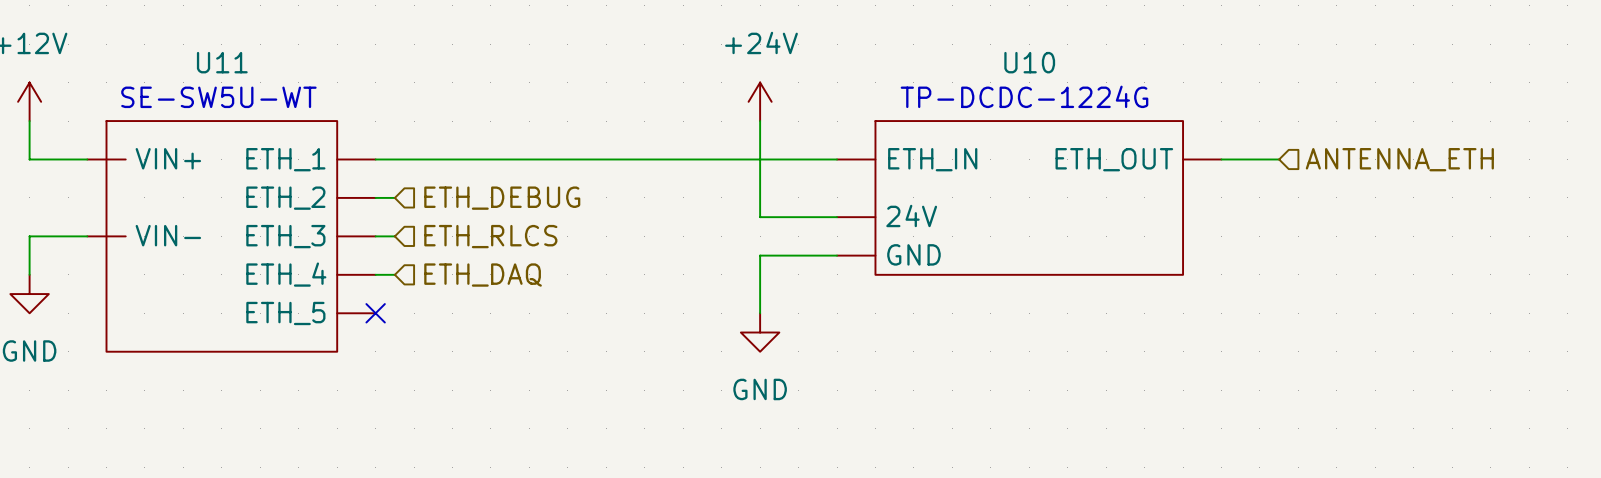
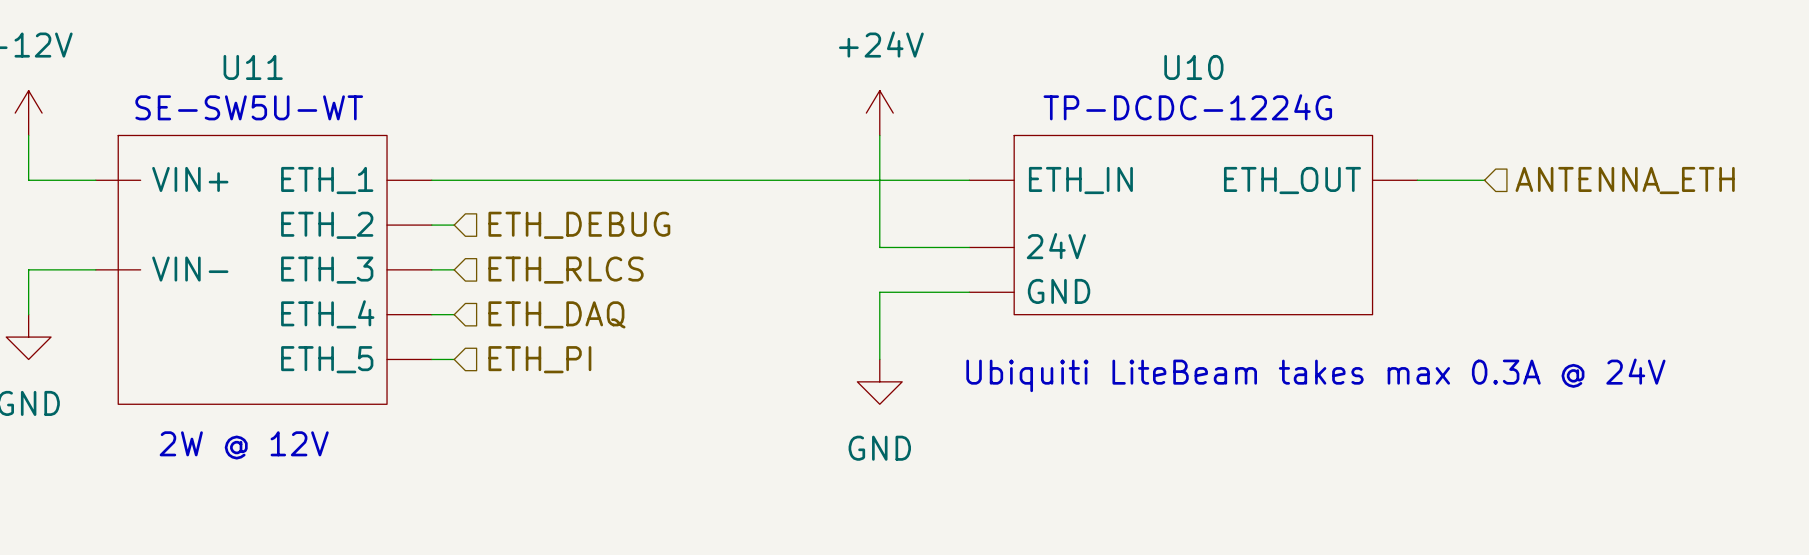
wire: none -> (431, 359) (454, 359)
no-connect mark: (375, 313) -> none
hierarchical label: none -> ETH_PI (539, 359)
text: none -> Ubiquiti LiteBeam takes max 0.3A @ 24V (1315, 375)
text: none -> 2W @ 12V (244, 445)

